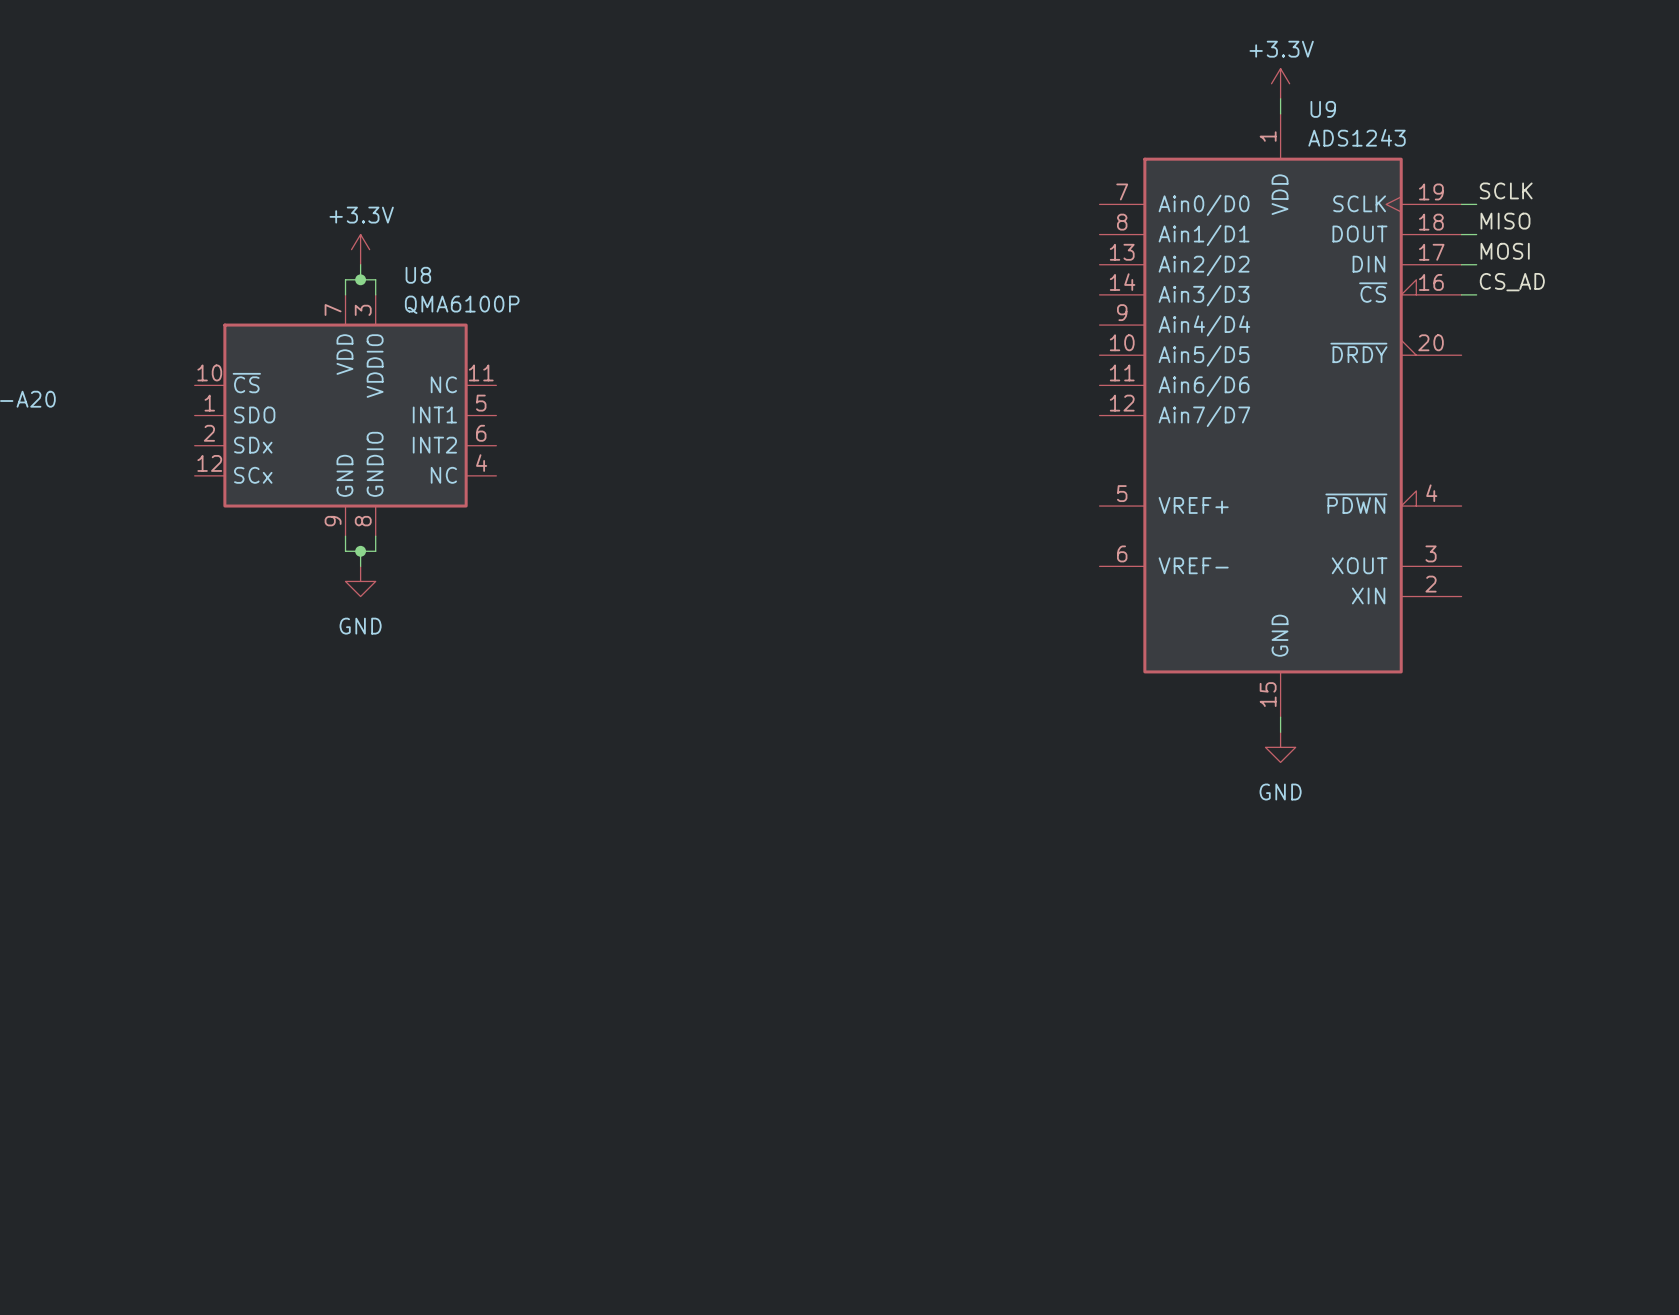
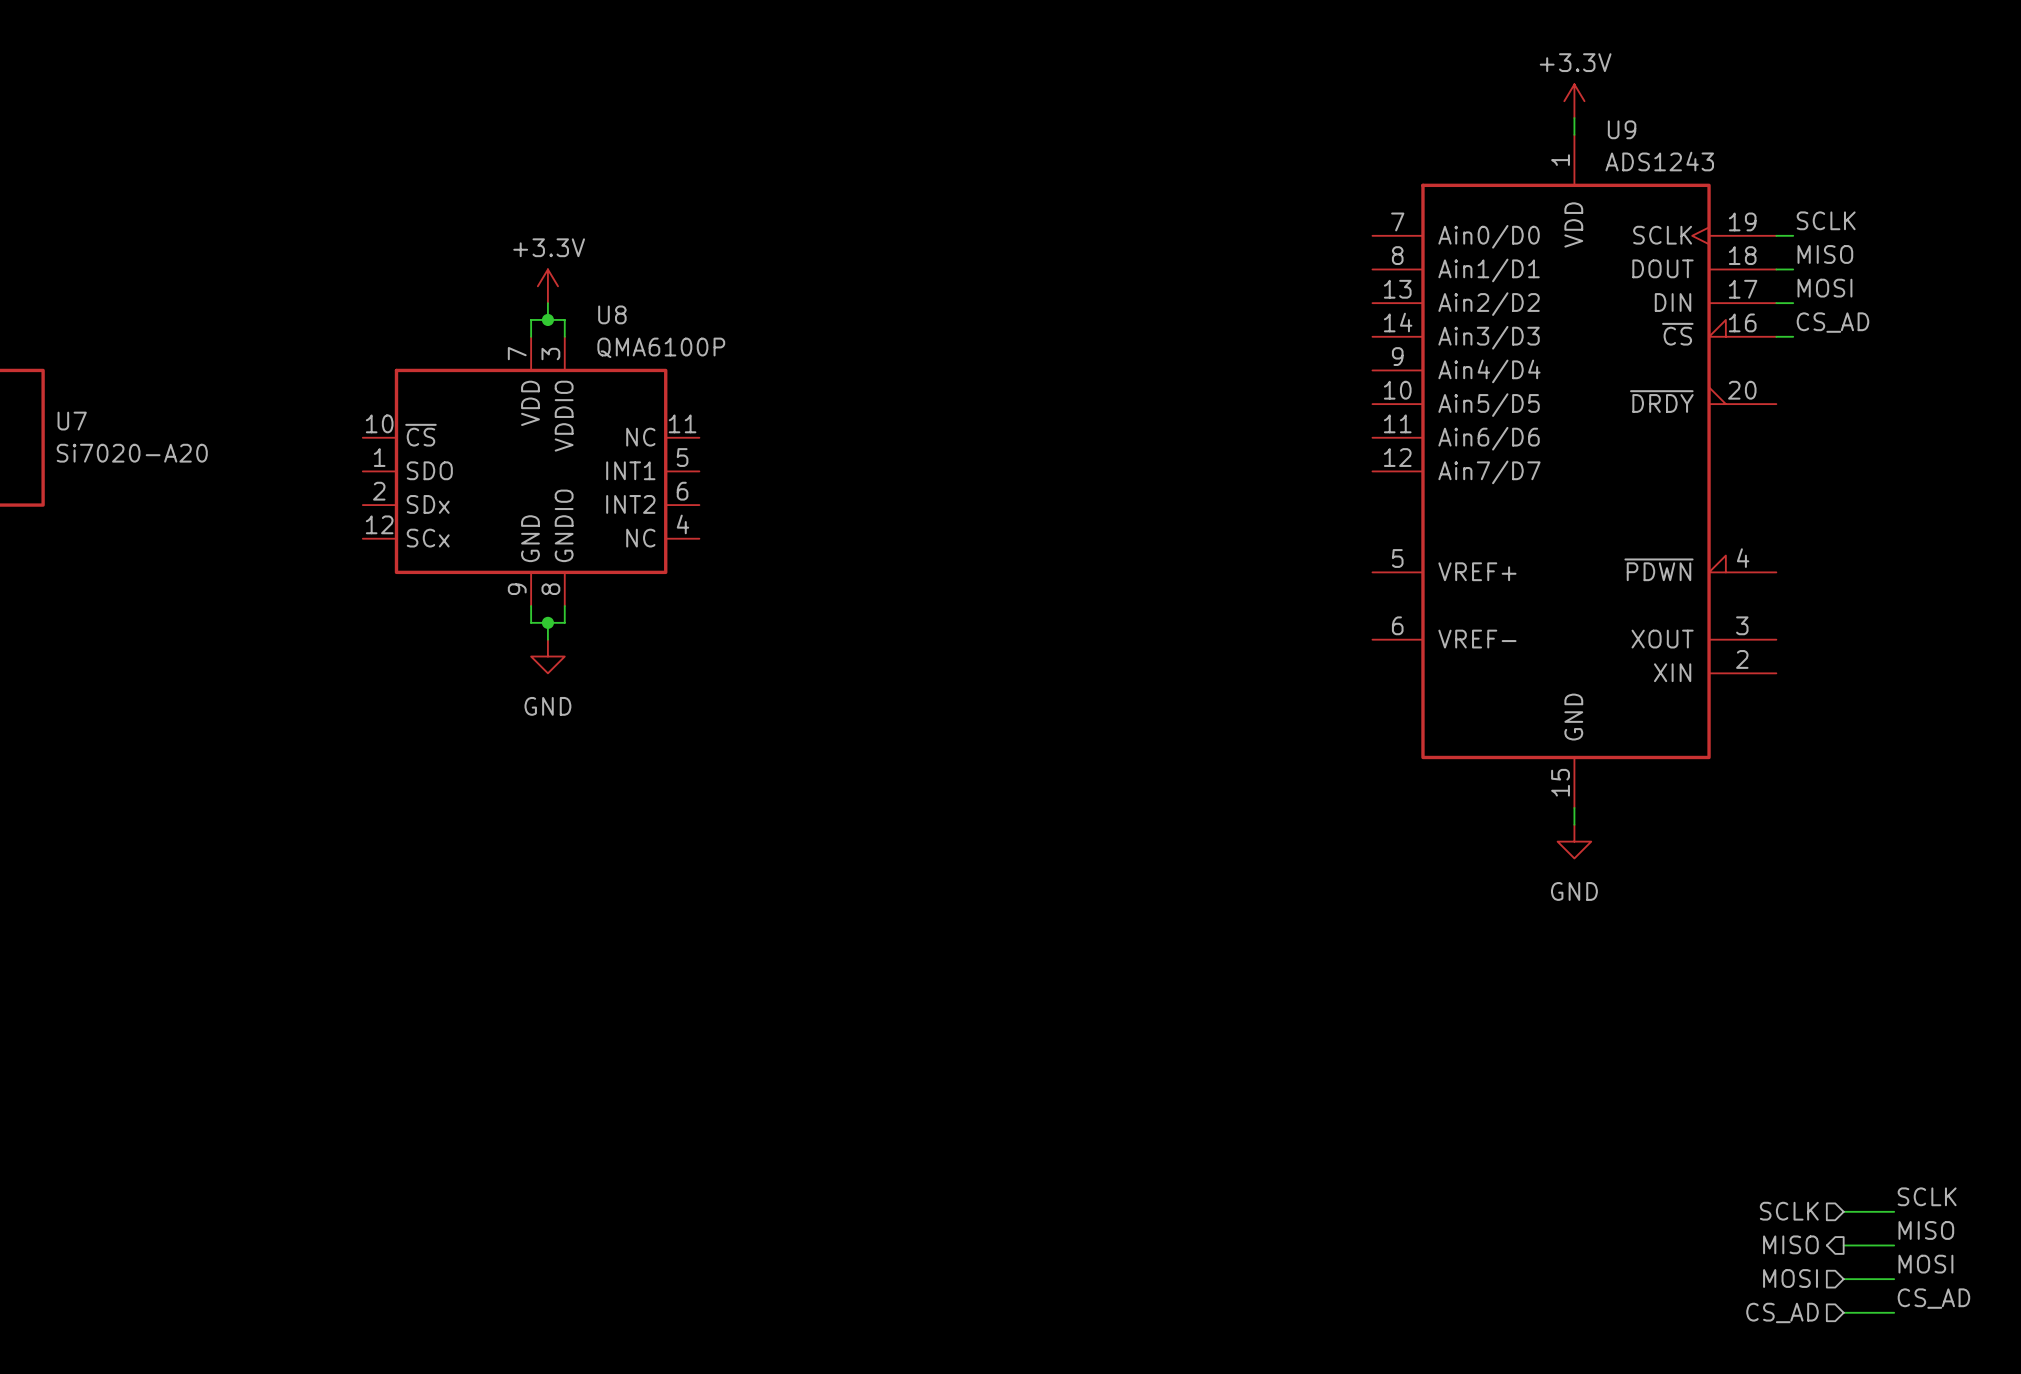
label: none -> SCLK (1927, 1196)
hierarchical label: none -> SCLK (1789, 1211)
wire: none -> (1843, 1211) (1894, 1211)
label: none -> MISO (1926, 1230)
hierarchical label: none -> MISO (1790, 1244)
wire: none -> (1843, 1245) (1894, 1245)
label: none -> MOSI (1925, 1264)
hierarchical label: none -> MOSI (1790, 1278)
wire: none -> (1843, 1279) (1894, 1279)
label: none -> CS_AD (1933, 1298)
hierarchical label: none -> CS_AD (1782, 1312)
wire: none -> (1843, 1312) (1894, 1312)

